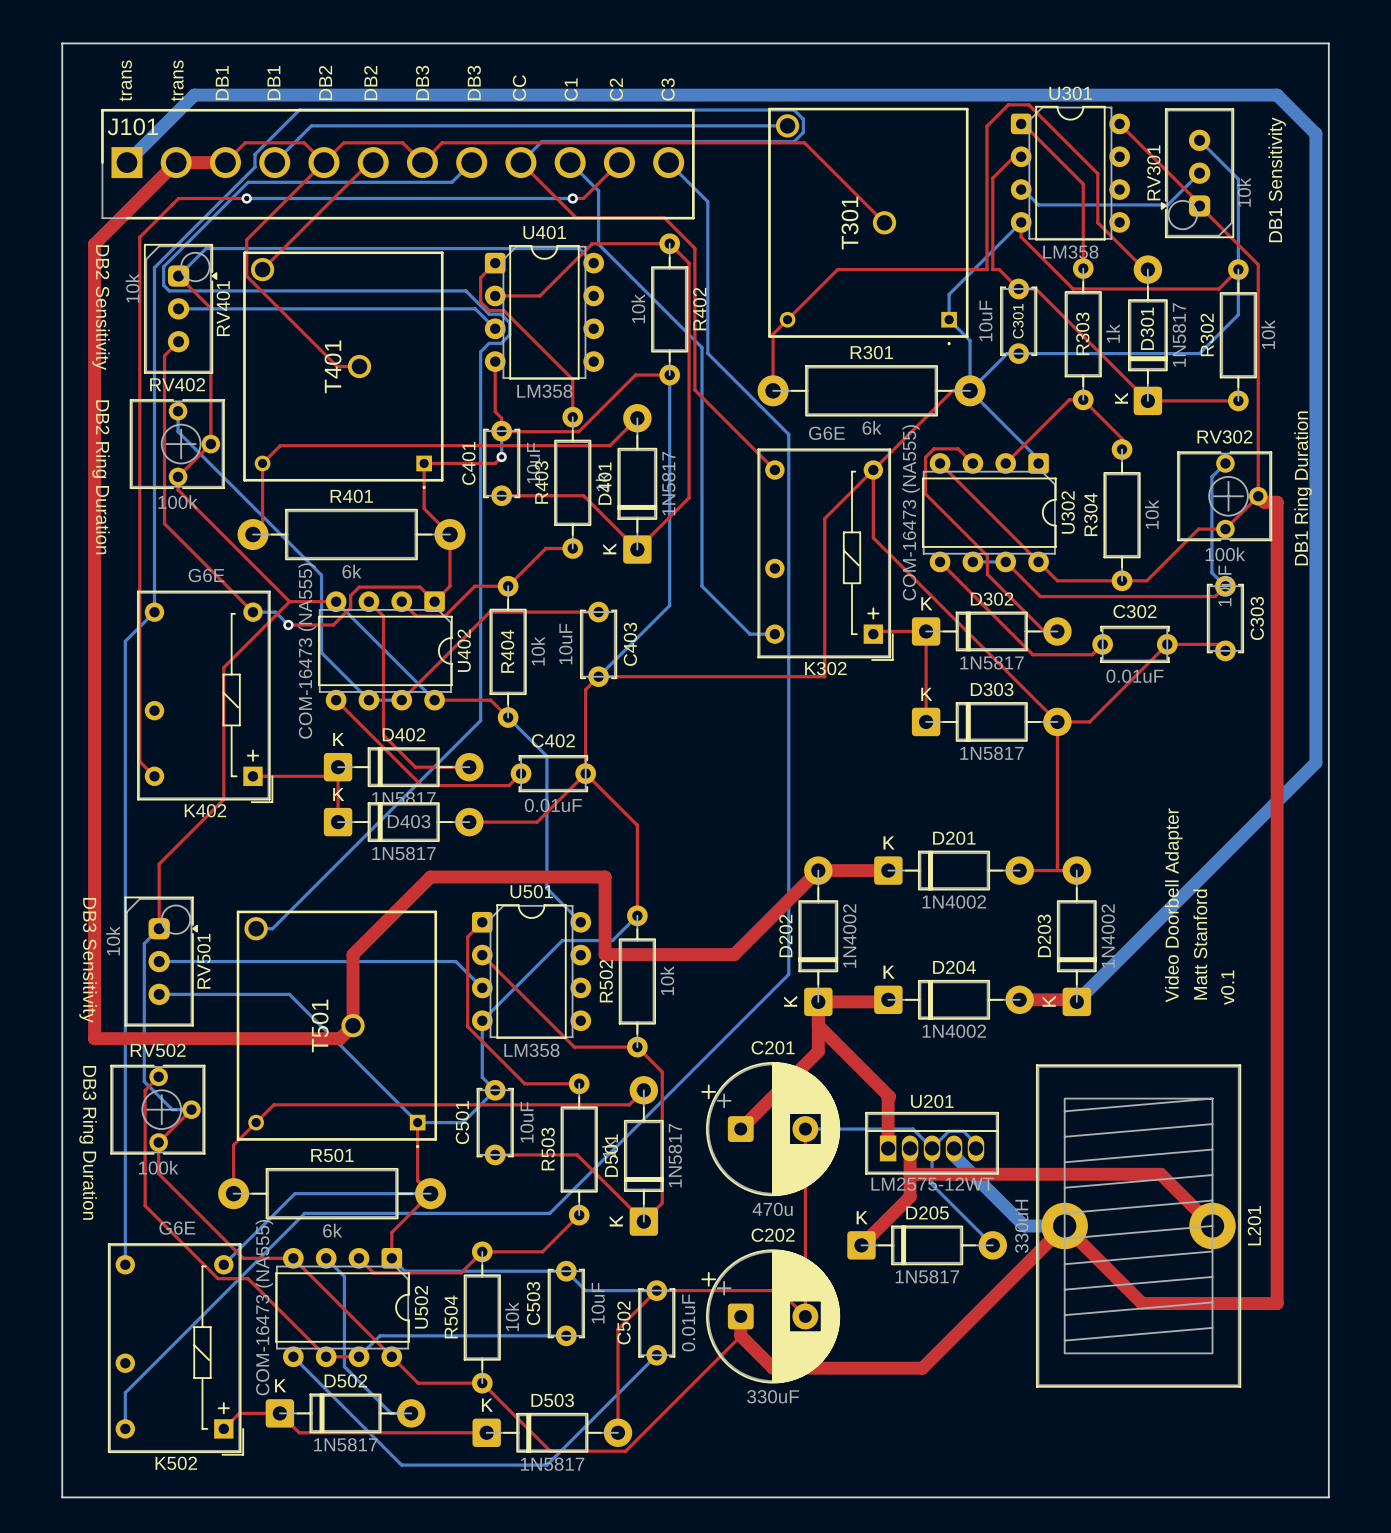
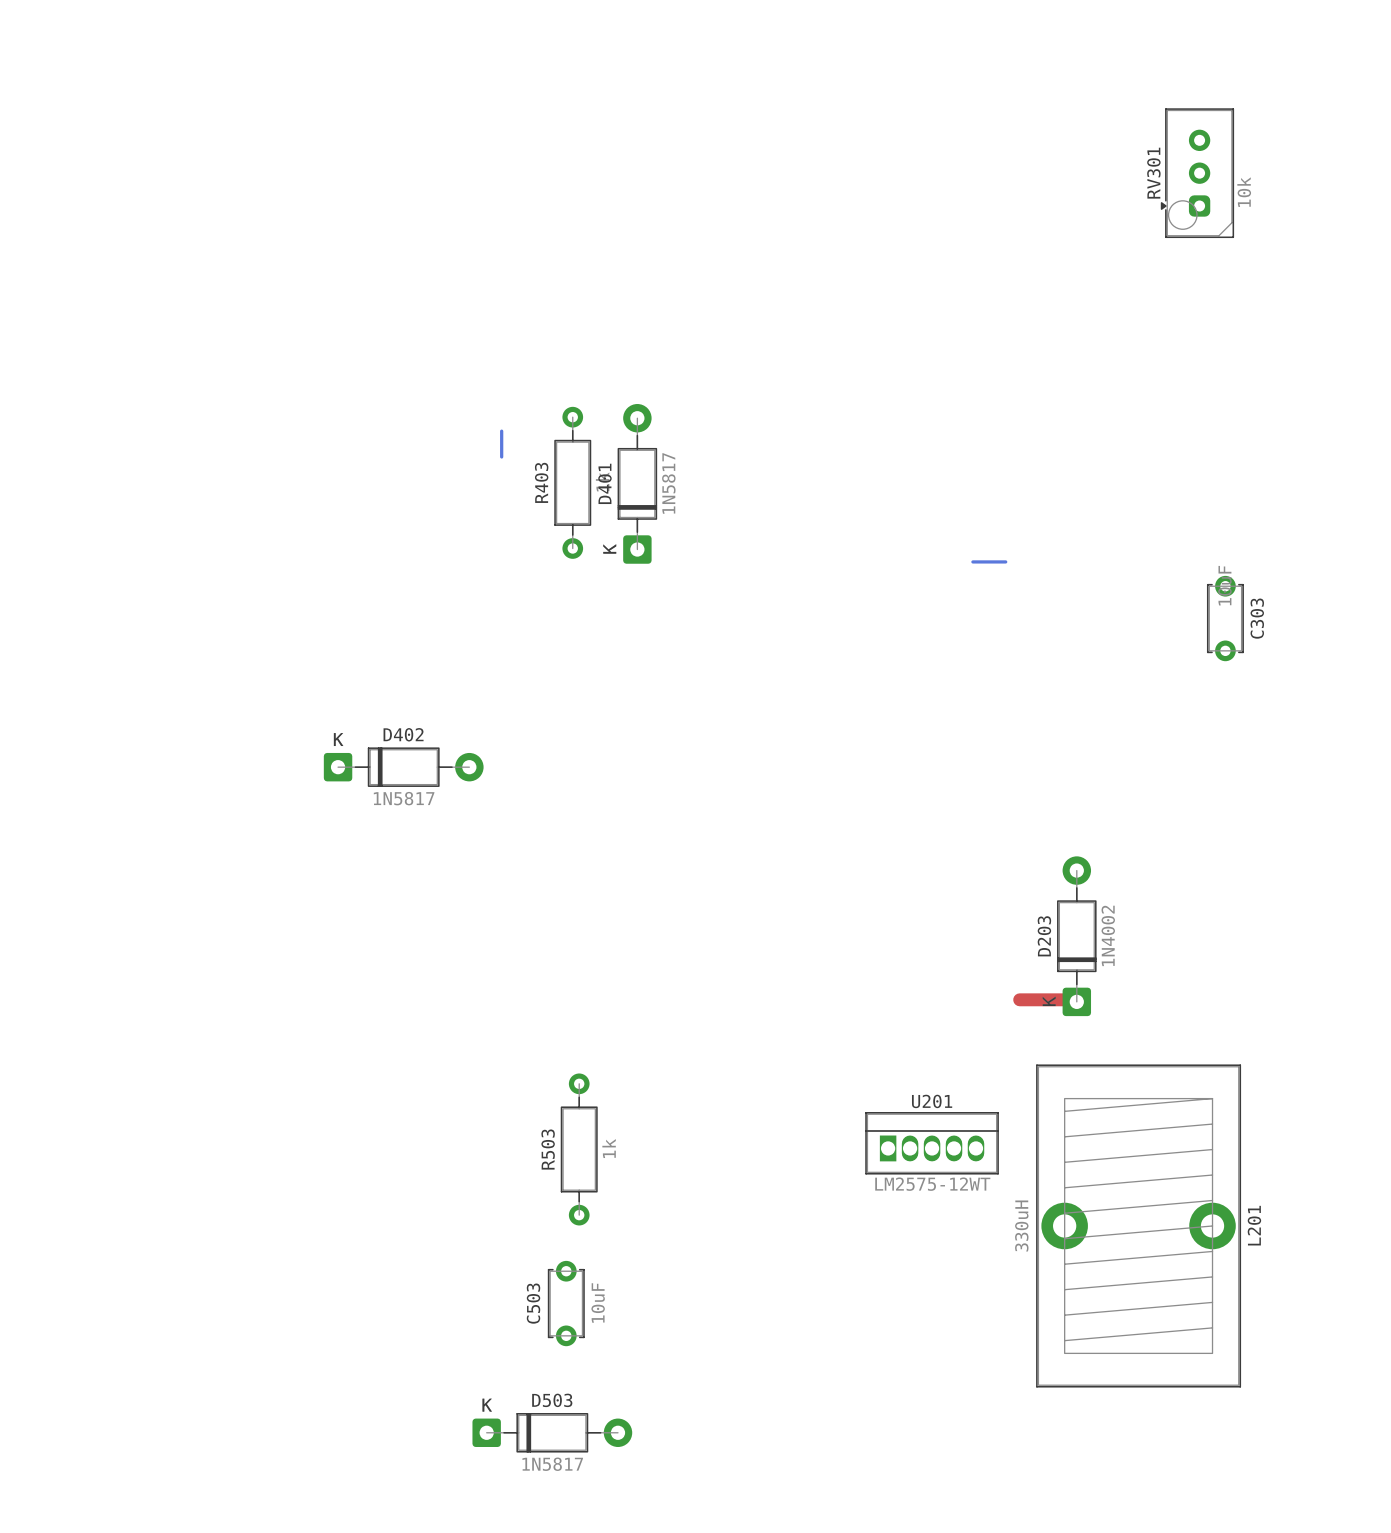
board edge: (62, 43) (1328, 43) (1328, 1497) (62, 1497) (62, 43) -> none
text: trans (125, 80) -> none
text: trans (177, 80) -> none
text: DB1 (222, 82) -> none
text: DB1 (273, 82) -> none
text: DB3 (422, 82) -> none
text: DB3 (474, 82) -> none
text: DB2 (325, 83) -> none
text: DB2 (370, 83) -> none
text: CC (519, 87) -> none
text: C1 (571, 89) -> none
text: C2 (616, 89) -> none
text: C3 (668, 89) -> none
top track: (1018, 119) (1083, 184) (1083, 268) -> none
top track: (1119, 123) (1258, 264) (1258, 496) -> none
bottom track: (787, 125) (311, 125) (274, 162) -> none
bottom track: (1199, 140) (1238, 179) (1238, 314) (1199, 353) (1007, 353) (970, 390) -> none
top track: (1018, 152) (992, 178) (992, 269) (999, 269) (1018, 288) (1035, 288) (1147, 400) (1238, 400) -> none
bottom track: (126, 162) (194, 95) (1277, 95) (1315, 133) (1315, 762) (1076, 1001) -> none
top track: (323, 162) (304, 142) (245, 142) (225, 162) (176, 162) (94, 244) (94, 1038) (340, 1038) (353, 1025) (353, 954) (430, 877) (605, 877) (605, 954) (734, 954) (818, 870) (888, 870) -> none
top track: (373, 162) (369, 162) (262, 269) -> none
bottom track: (471, 162) (451, 182) (248, 182) (163, 266) (163, 285) (169, 290) (465, 290) (489, 314) (501, 314) (509, 322) (509, 334) (501, 343) (489, 343) (480, 351) (480, 720) (272, 928) (256, 928) -> none
top track: (520, 162) (576, 217) (664, 217) (694, 248) (694, 390) (774, 470) -> none
bottom track: (520, 162) (541, 141) (794, 141) (803, 132) (803, 119) (794, 110) (299, 110) (255, 154) (255, 167) (154, 267) (154, 612) (125, 641) (125, 1264) -> none
bottom track: (570, 162) (598, 191) (598, 244) (702, 347) (702, 586) (749, 634) (774, 634) -> none
top track: (619, 162) (583, 198) (572, 198) -> none
bottom track: (668, 162) (707, 201) (707, 353) (788, 434) (788, 974) (549, 1213) (304, 1213) (125, 1392) (125, 1428) -> none
J101: (397, 164) -> none
U301: LM358 (1070, 173) -> none
bottom track: (1199, 173) (1167, 204) (1038, 204) (1018, 185) -> none
text: DB1 Sensitivity (1277, 179) -> none
top track: (246, 198) (178, 198) (139, 237) (139, 761) (154, 776) -> none
bottom track: (246, 198) (572, 198) -> none
via: (246, 198) -> none
via: (572, 198) -> none
top track: (884, 222) (804, 142) (442, 142) (422, 162) (402, 142) (343, 142) (246, 239) (246, 276) (337, 366) (359, 366) -> none
top track: (1021, 222) (1021, 237) (1073, 288) (1218, 288) (1238, 269) -> none
bottom track: (1021, 222) (949, 294) (949, 319) (970, 340) (970, 390) -> none
T301: (868, 226) -> none
top track: (495, 263) (480, 277) (480, 301) (489, 310) (503, 310) (572, 379) (572, 417) -> none
bottom track: (593, 263) (579, 248) (206, 248) (178, 276) -> none
top track: (1147, 269) (1144, 269) (1097, 222) (1097, 173) (1028, 104) (1008, 104) (986, 126) (986, 269) (837, 269) (773, 334) (773, 390) -> none
top track: (178, 276) (210, 308) (210, 444) (178, 476) (178, 490) (289, 601) -> none
top track: (495, 295) (539, 295) (592, 243) (669, 243) (689, 263) (689, 497) (637, 549) (583, 495) (501, 495) -> none
text: DB2 Sensitivity (100, 307) -> none
bottom track: (178, 308) (475, 308) (495, 328) -> none
RV401: 10k (180, 308) -> none
R402: 10k (669, 309) -> none
U401: LM358 (544, 312) -> none
C301: 10uF (1018, 321) -> none
R303: 1k (1083, 334) -> none
D301: 1N5817 (1147, 335) -> none
R302: 10k (1238, 335) -> none
top track: (178, 341) (164, 355) (164, 523) (252, 612) -> none
top track: (495, 361) (495, 411) (501, 418) (502, 431) (578, 431) (635, 375) (669, 375) -> none
T401: (343, 370) -> none
bottom track: (669, 375) (669, 605) (598, 676) -> none
R301: 6k (871, 390) -> none
top track: (970, 390) (952, 390) (824, 518) (824, 676) (598, 676) (585, 689) (585, 773) -> none
bottom track: (970, 390) (1038, 459) (1038, 463) -> none
bottom track: (178, 411) (178, 431) (321, 575) (321, 652) (368, 700) (401, 700) -> none
top track: (637, 418) (609, 445) (280, 445) (262, 463) (262, 524) (253, 534) -> none
RV402: 100k (177, 444) -> none
top track: (1122, 449) (1122, 438) (1083, 399) (1069, 399) (1005, 463) -> none
top track: (501, 456) (495, 463) (424, 463) (424, 508) (449, 534) (449, 586) (434, 601) (420, 587) (359, 587) (350, 595) (350, 607) (333, 625) (288, 625) -> none
via: (501, 456) -> none
C401: 10uF (501, 463) -> none
top track: (940, 463) (1057, 580) (1146, 580) (1198, 529) (1225, 529) (1258, 496) -> none
top track: (972, 463) (958, 448) (934, 448) (925, 457) (925, 493) (987, 555) (987, 574) (1044, 631) (1057, 631) -> none
bottom track: (1225, 463) (1211, 476) (1211, 572) (1225, 586) -> none
top track: (873, 470) (873, 537) (1057, 721) -> none
text: DB2 Ring Duration (100, 477) -> none
text: DB1 Ring Duration (1303, 488) -> none
RV302: 100k (1224, 496) -> none
top track: (1258, 496) (1264, 502) (1277, 502) (1277, 1303) (1142, 1303) (1064, 1225) (922, 1368) (773, 1368) (740, 1335) (740, 1316) (740, 1336) (625, 1451) (550, 1451) (482, 1383) (418, 1383) (293, 1258) (243, 1258) (158, 1173) (158, 1142) (191, 1109) -> none
U302: COM-16473 (NA555) (989, 512) -> none
R304: 10k (1122, 515) -> none
R401: 6k (351, 534) -> none
top track: (572, 548) (545, 548) (508, 586) (474, 586) (444, 616) (416, 616) (401, 601) -> none
K302: G6E (825, 554) -> none
top track: (940, 561) (1032, 654) (1092, 654) (1102, 644) -> none
top track: (1005, 561) (1040, 596) (1215, 596) (1225, 586) -> none
top track: (289, 601) (336, 601) -> none
top track: (289, 601) (223, 667) (223, 799) (159, 864) (159, 928) -> none
bottom track: (336, 601) (434, 700) -> none
top track: (368, 601) (383, 616) (383, 735) (415, 767) (469, 767) -> none
bottom track: (252, 612) (275, 612) (288, 625) -> none
top track: (598, 612) (489, 612) (401, 700) -> none
via: (288, 625) -> none
D302: 1N5817 (991, 631) -> none
top track: (873, 634) (876, 631) (926, 631) (926, 721) -> none
C403: 10uF (598, 644) -> none
C302: 0.01uF (1134, 644) -> none
U402: COM-16473 (NA555) (385, 650) -> none
top track: (1225, 650) (1218, 644) (1167, 644) (1089, 721) (1057, 721) -> none
R404: 10k (508, 651) -> none
K402: G6E (205, 696) -> none
top track: (336, 700) (421, 785) (509, 785) (521, 773) -> none
top track: (434, 700) (490, 700) (508, 717) -> none
bottom track: (508, 717) (546, 756) (546, 888) (580, 922) -> none
D303: 1N5817 (991, 721) -> none
top track: (1057, 721) (1057, 870) -> none
C402: 0.01uF (553, 773) -> none
top track: (585, 773) (537, 822) (469, 822) -> none
top track: (585, 773) (637, 825) (637, 915) -> none
top track: (252, 776) (328, 776) (338, 767) (338, 822) -> none
D403: 1N5817 (403, 822) -> none
D201: 1N4002 (954, 870) -> none
top track: (1019, 870) (1076, 870) -> none
text: Video Doorbell Adapter (1173, 905) -> none
bottom track: (637, 915) (612, 940) (562, 940) (482, 1020) (482, 1077) (495, 1090) (462, 1122) (417, 1122) (289, 994) (159, 994) -> none
top track: (482, 922) (467, 936) (467, 1026) (524, 1083) (579, 1083) -> none
bottom track: (159, 928) (144, 943) (144, 1081) (172, 1109) (191, 1109) -> none
D202: 1N4002 (818, 936) -> none
text: Matt Stanford (1200, 944) -> none
top track: (482, 955) (574, 1047) (637, 1047) (662, 1072) (662, 1203) (643, 1221) (577, 1154) (495, 1154) -> none
text: DB3 Sensitivity (88, 960) -> none
bottom track: (159, 961) (455, 961) (482, 987) -> none
RV501: 10k (161, 961) -> none
U501: LM358 (531, 971) -> none
R502: 10k (637, 981) -> none
text: v0.1 (1227, 987) -> none
top track: (888, 999) (886, 1001) (818, 1001) (818, 1051) (740, 1129) -> none
D204: 1N4002 (954, 999) -> none
top track: (818, 1025) (889, 1096) (888, 1148) -> none
T501: (336, 1029) -> none
top track: (158, 1076) (145, 1090) (145, 1205) (218, 1278) (248, 1278) (326, 1356) (358, 1356) -> none
top track: (643, 1090) (629, 1104) (273, 1104) (233, 1145) (233, 1193) -> none
RV502: 100k (157, 1109) -> none
top track: (417, 1122) (417, 1180) (430, 1193) (391, 1232) (391, 1258) -> none
C501: 10uF (495, 1122) -> none
C201: 470u (770, 1129) -> none
top track: (805, 1129) (805, 1316) (779, 1290) (656, 1290) (617, 1329) (617, 1432) -> none
bottom track: (805, 1129) (912, 1129) (932, 1148) -> none
text: DB3 Ring Duration (88, 1142) -> none
top track: (910, 1148) (910, 1196) (861, 1245) -> none
bottom track: (932, 1148) (932, 1184) (992, 1245) -> none
bottom track: (932, 1148) (948, 1131) (963, 1131) (976, 1143) (976, 1148) -> none
bottom track: (954, 1148) (954, 1155) (1024, 1225) (1064, 1225) -> none
D501: 1N5817 (643, 1155) -> none
top track: (910, 1174) (1160, 1174) (1212, 1225) -> none
R501: 6k (332, 1193) -> none
bottom track: (430, 1193) (294, 1193) (223, 1264) -> none
top track: (579, 1215) (542, 1251) (482, 1251) (461, 1272) (373, 1272) (358, 1258) -> none
D205: 1N5817 (927, 1245) -> none
bottom track: (326, 1258) (344, 1276) (344, 1366) (391, 1413) (411, 1413) -> none
bottom track: (391, 1258) (404, 1271) (566, 1271) (585, 1290) (656, 1290) -> none
U502: COM-16473 (NA555) (342, 1307) -> none
C202: 330uF (770, 1316) -> none
R504: 10k (482, 1317) -> none
C502: 0.01uF (656, 1322) -> none
bottom track: (566, 1335) (379, 1335) (358, 1356) -> none
K502: G6E (175, 1349) -> none
bottom track: (656, 1355) (546, 1465) (401, 1465) (293, 1356) -> none
D502: 1N5817 (345, 1413) -> none
top track: (223, 1428) (239, 1413) (279, 1413) (299, 1432) (486, 1432) -> none

